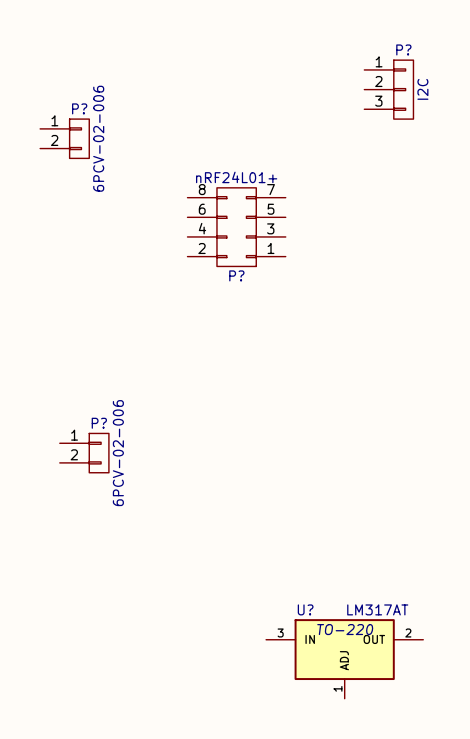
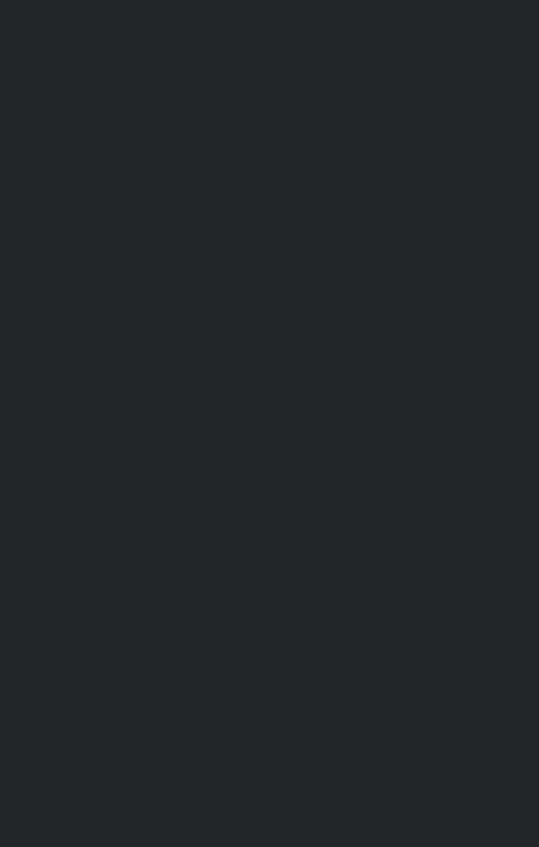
P?: I2C (388, 89) -> none
P?: 6PCV-02-006 (64, 138) -> none
P?: nRF24L01+ (236, 227) -> none
P?: 6PCV-02-006 (84, 453) -> none
U?: LM317AT (344, 658) -> none

